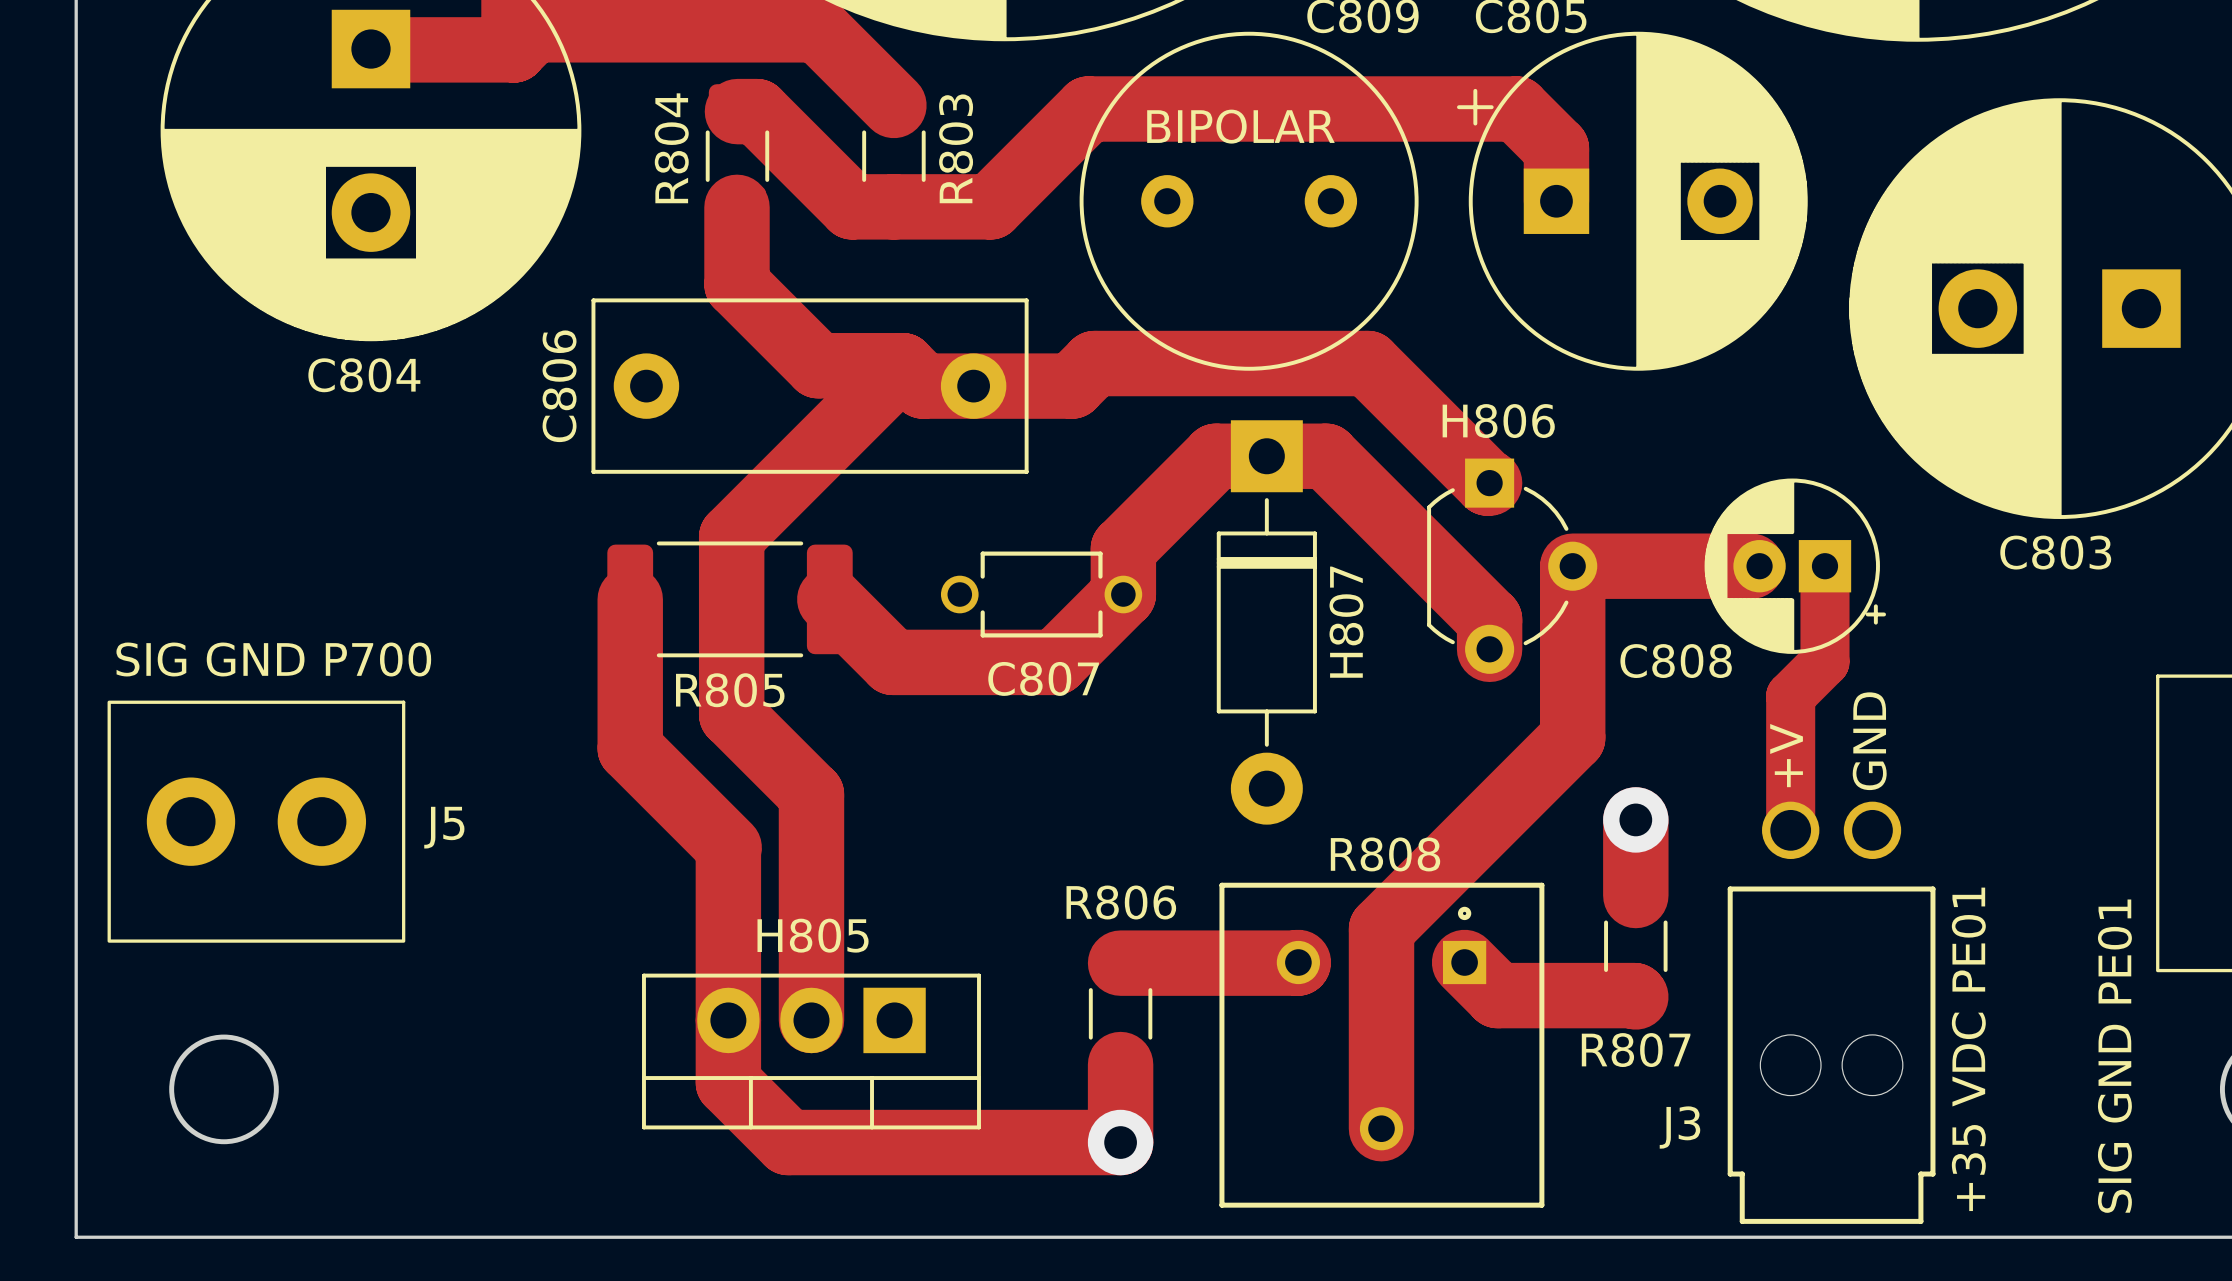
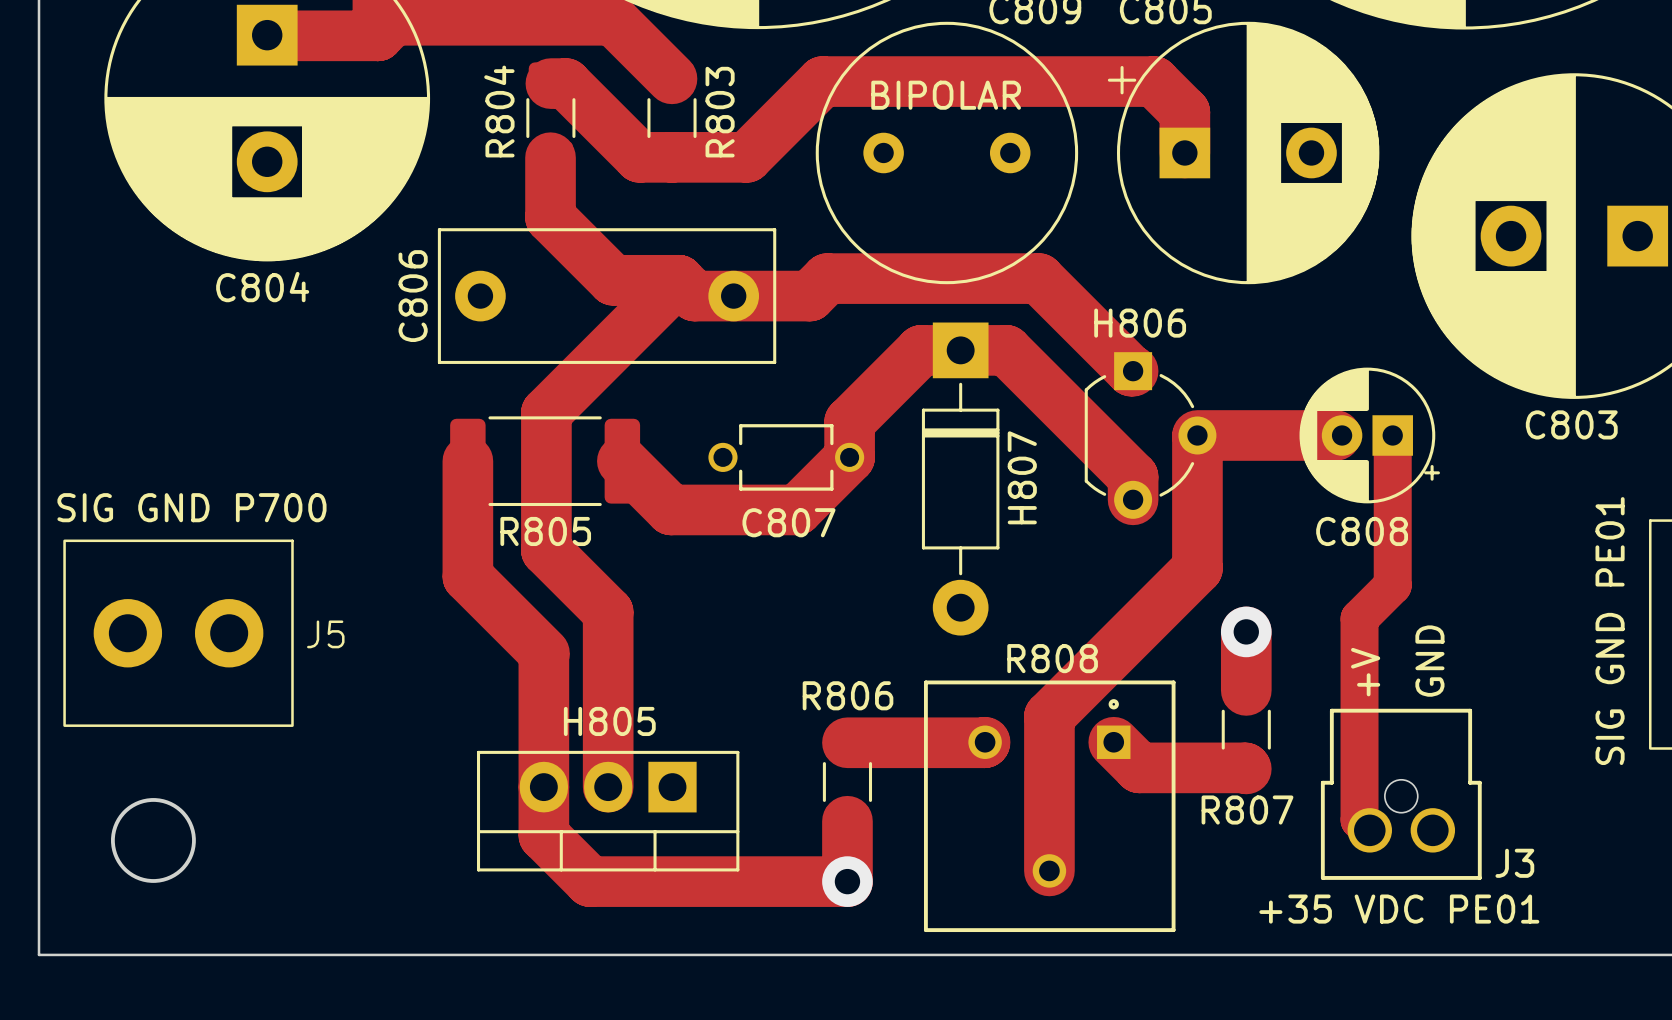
C808 name position: C808 (1676, 661) -> C808 (1362, 531)
track: (1824, 661) (1790, 696) (1790, 830) -> (1392, 509) (1392, 585) (1359, 618) (1359, 820) (1369, 830)
text position: GND (1869, 741) -> GND (1429, 661)
text position: +V (1786, 755) -> +V (1365, 672)
J3 footprint: [1727, 801, 1936, 1224] -> [1320, 708, 1482, 880]
text rotation: 0° (1968, 1049) -> 90° clockwise (1399, 909)
text position: SIG GND PE01 (2114, 1056) -> SIG GND PE01 (1610, 631)
J3 name position: J3 (1679, 1127) -> J3 (1514, 863)

